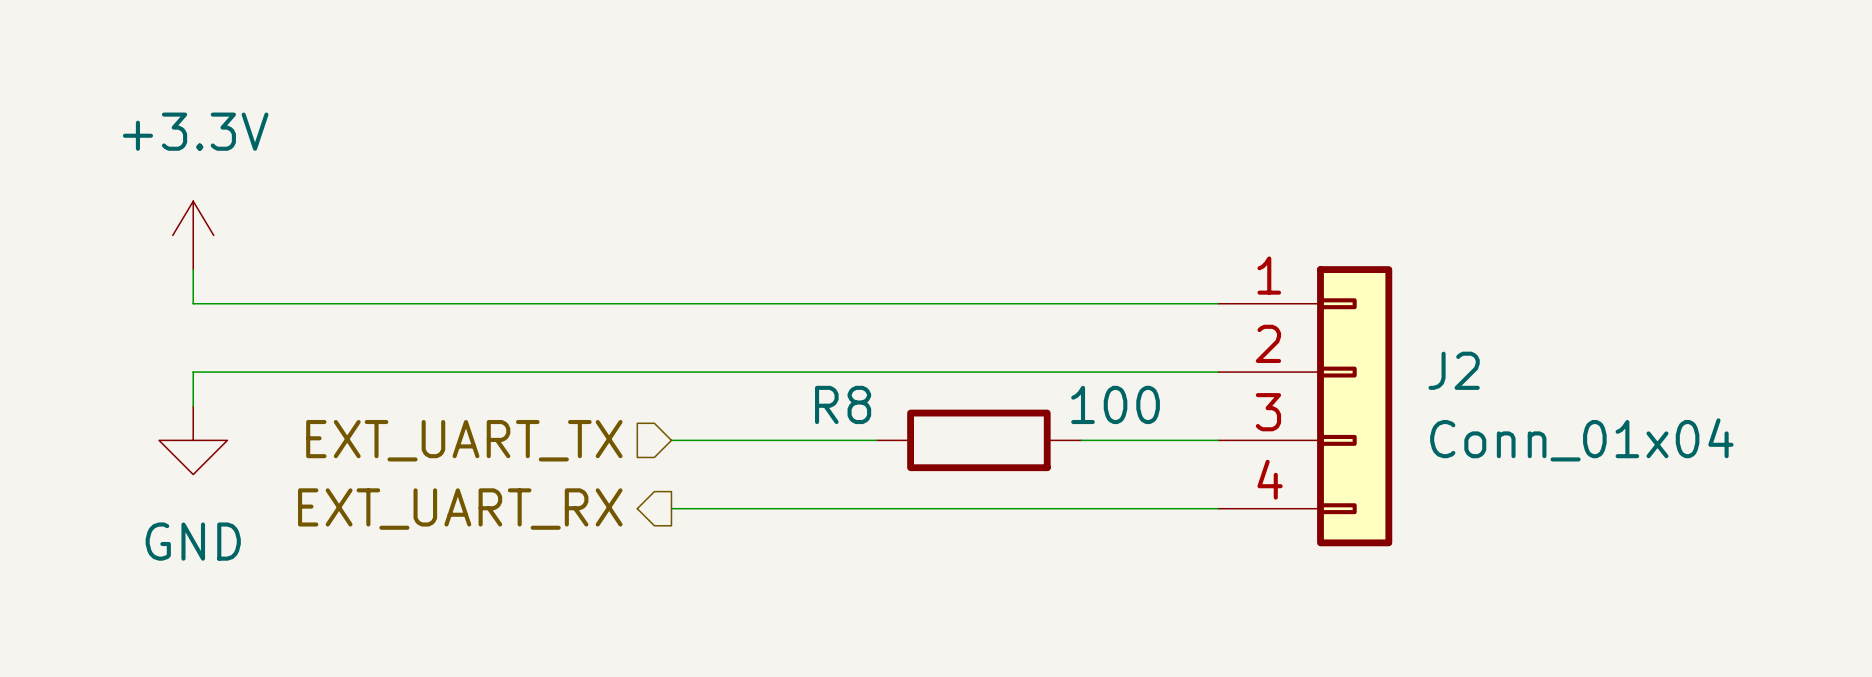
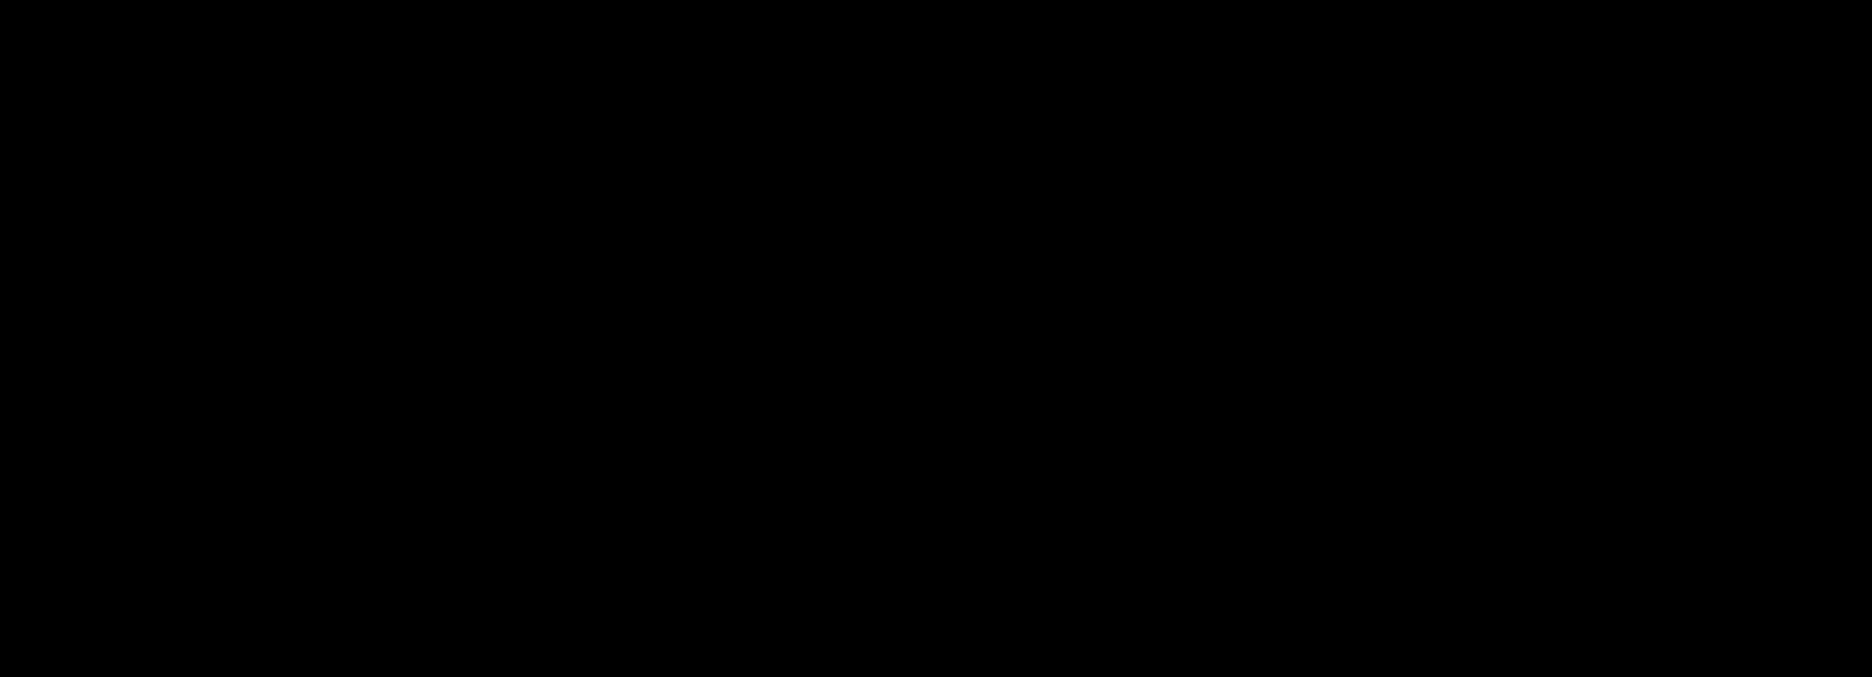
power symbol: +3.3V (193, 235) -> none
wire: (193, 269) (193, 303) (1218, 303) -> none
wire: (1218, 372) (193, 372) (193, 406) -> none
J2: Conn_01x04 (1305, 406) -> none
power symbol: GND (193, 440) -> none
hierarchical label: EXT_UART_TX (464, 440) -> none
wire: (671, 440) (876, 440) -> none
R8: 100 (978, 440) -> none
wire: (1081, 440) (1218, 440) -> none
wire: (671, 508) (1218, 508) -> none
hierarchical label: EXT_UART_RX (460, 509) -> none

